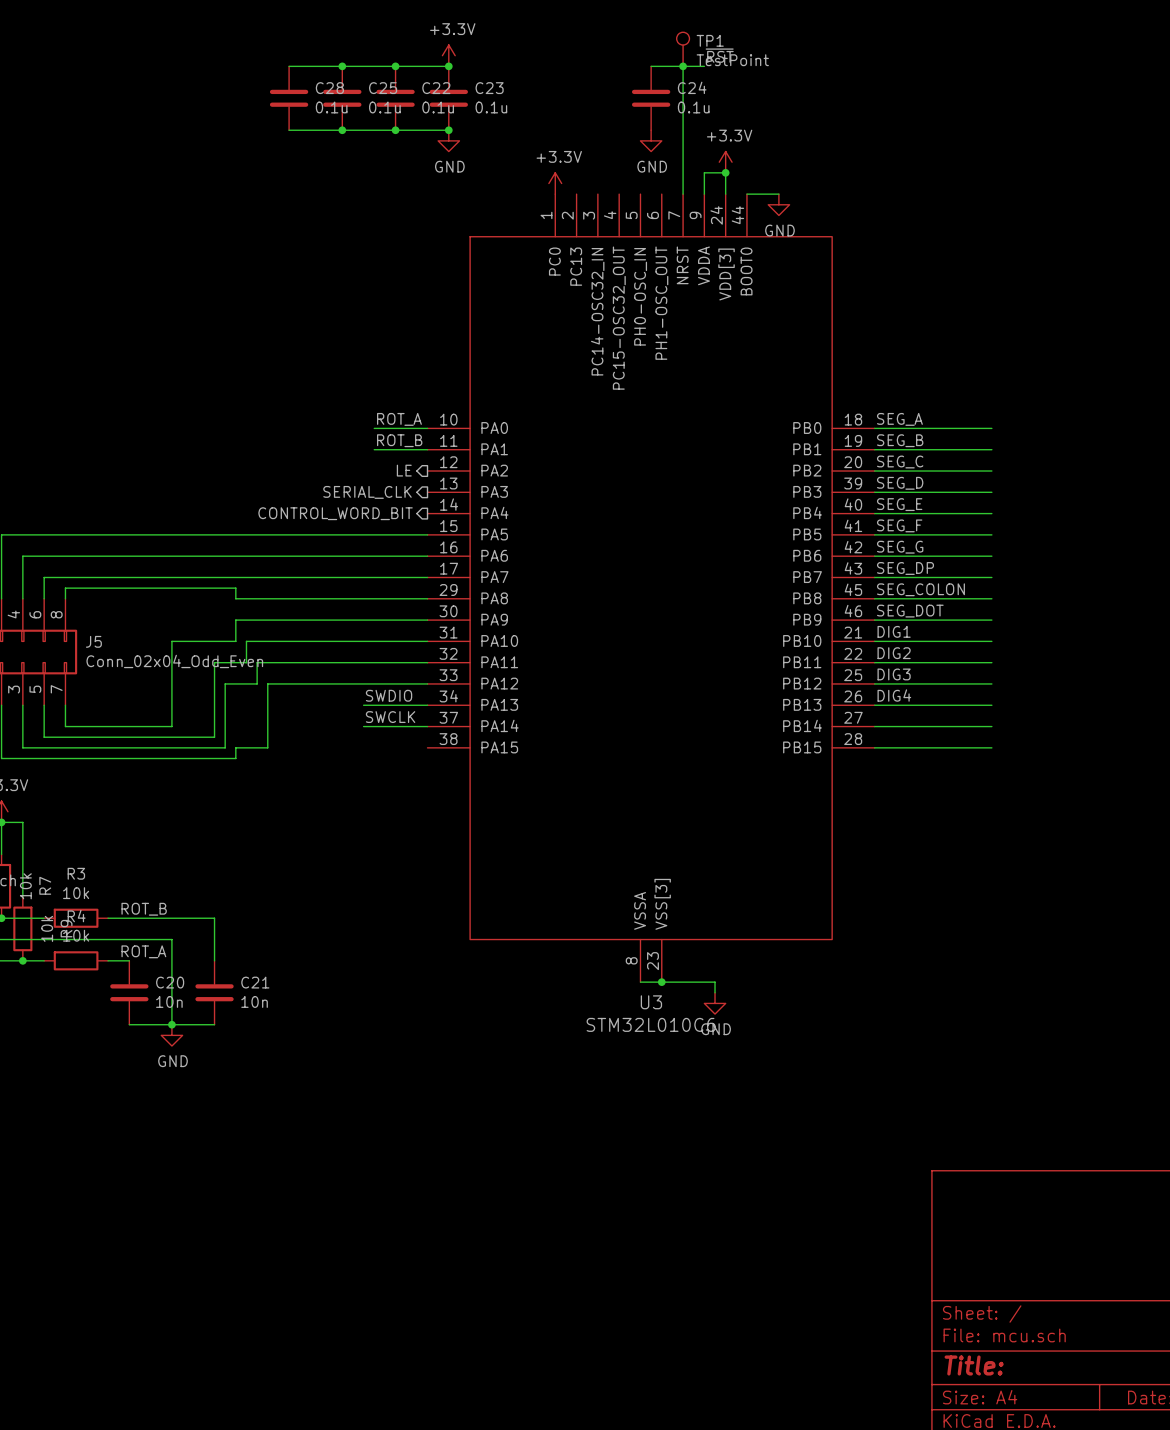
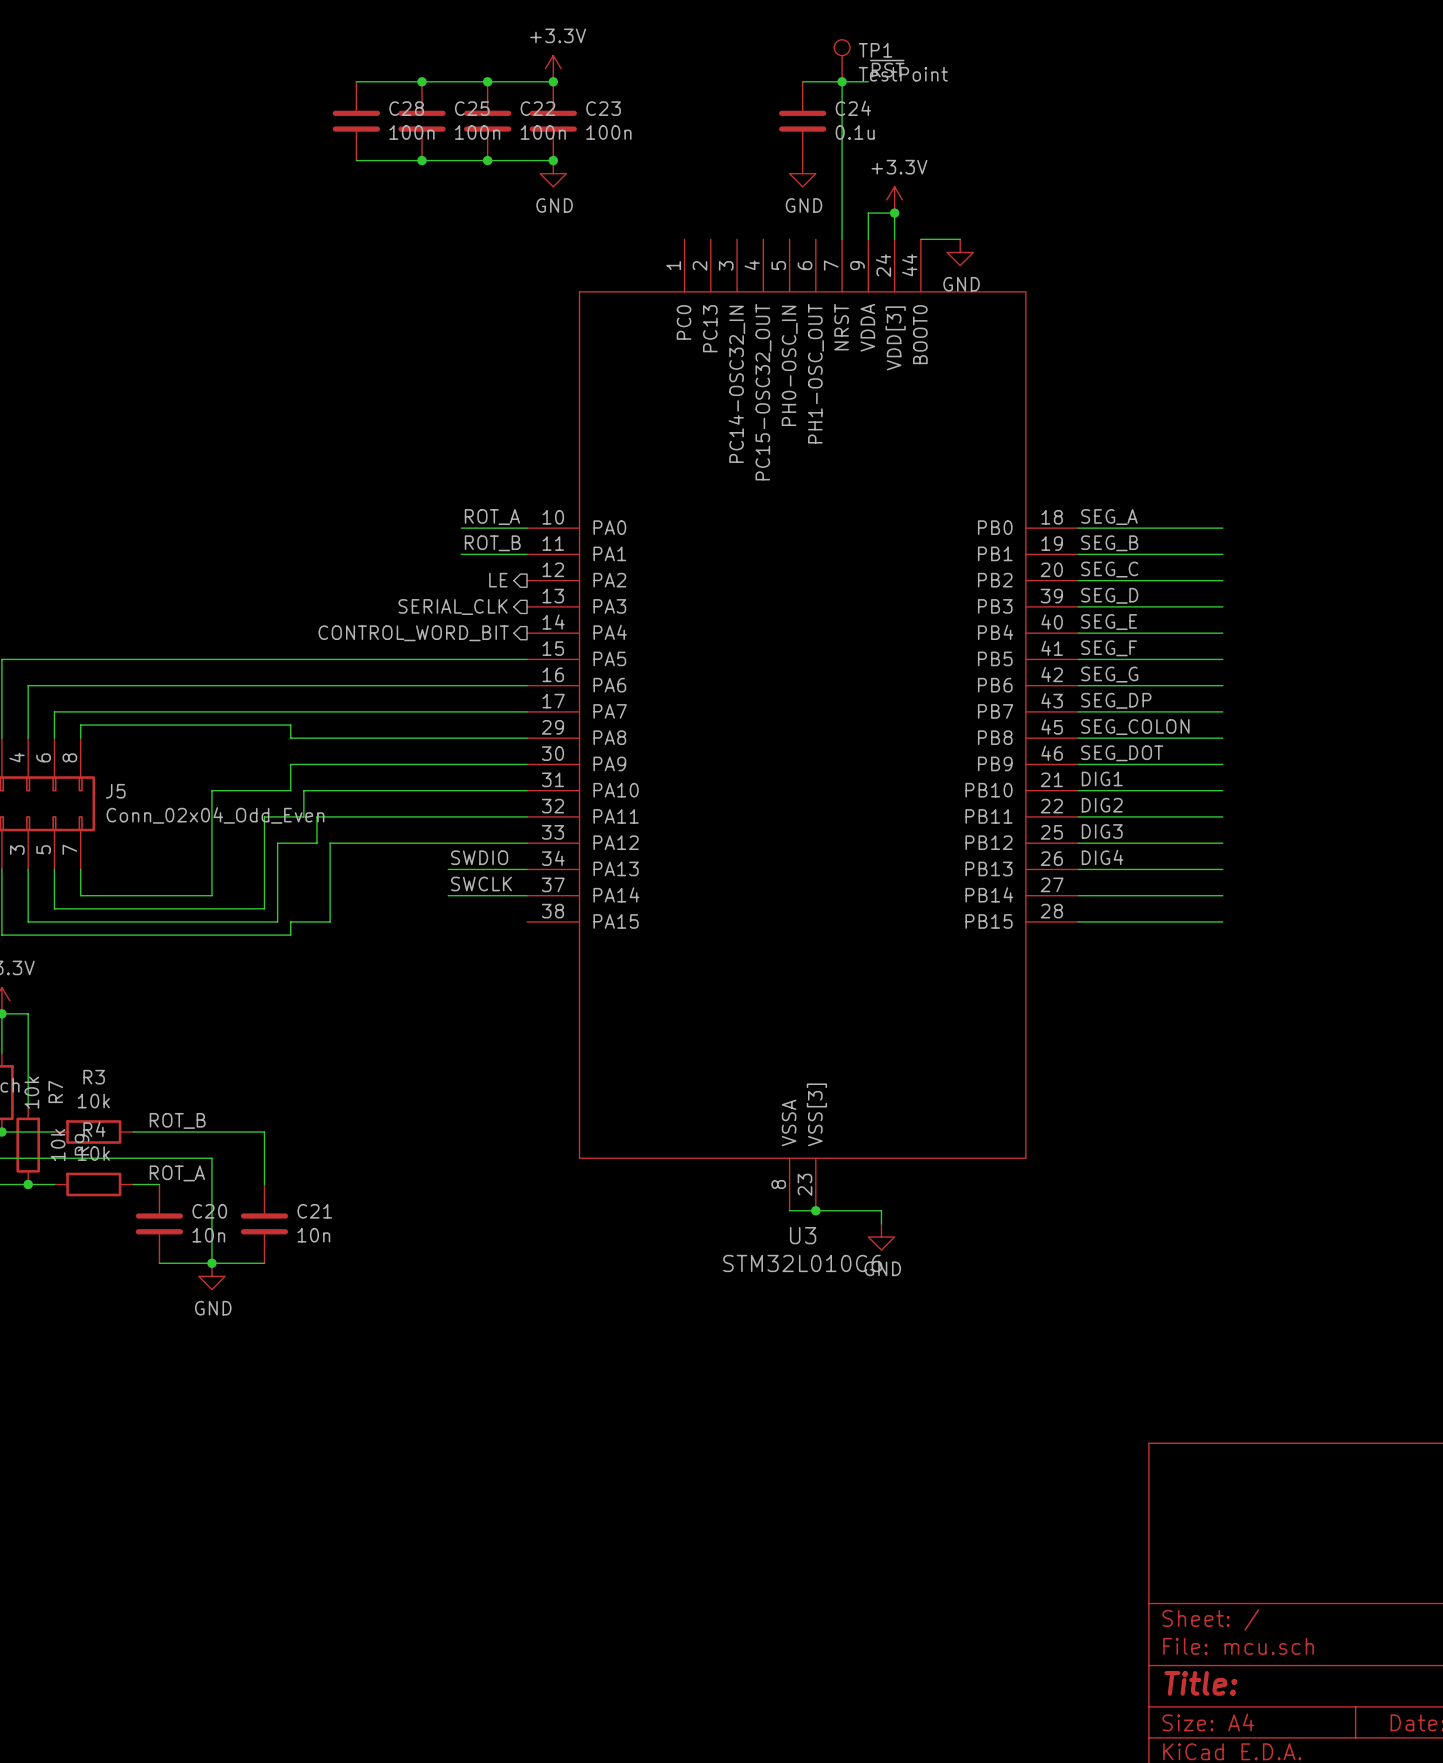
C28 value: 0.1u (331, 107) -> 100n (411, 132)
C25 value: 0.1u (384, 107) -> 100n (477, 132)
C22 value: 0.1u (438, 107) -> 100n (543, 132)
C23 value: 0.1u (491, 107) -> 100n (608, 132)
power symbol: +3.3V (555, 183) -> none

